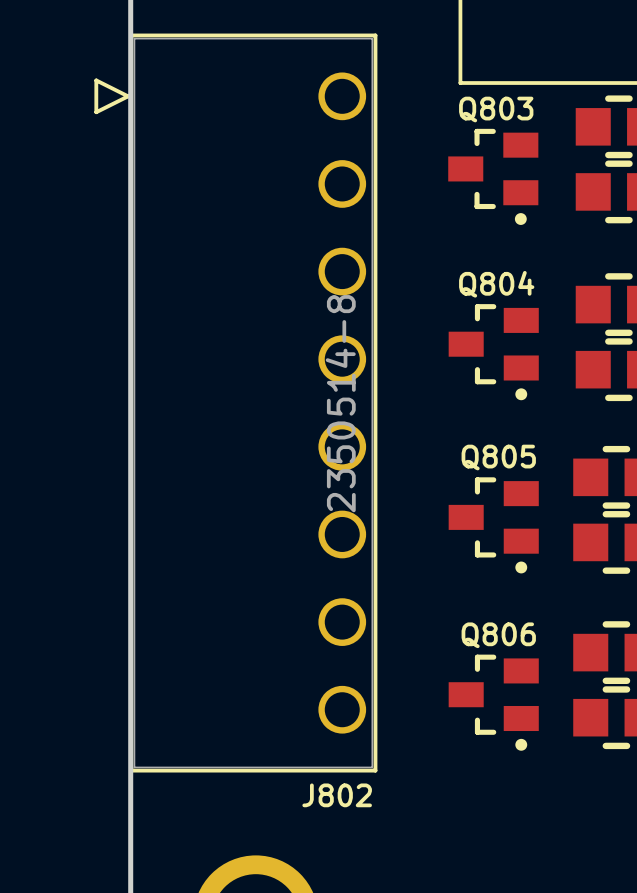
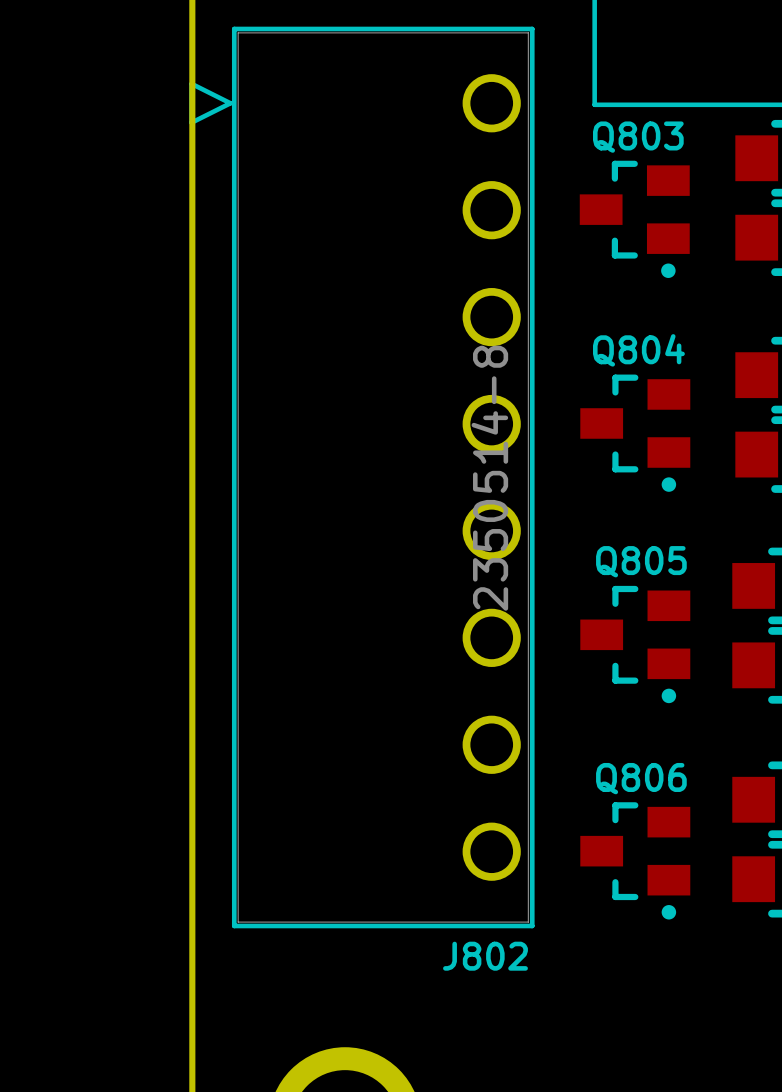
J802 position: (235, 403) -> (361, 477)

